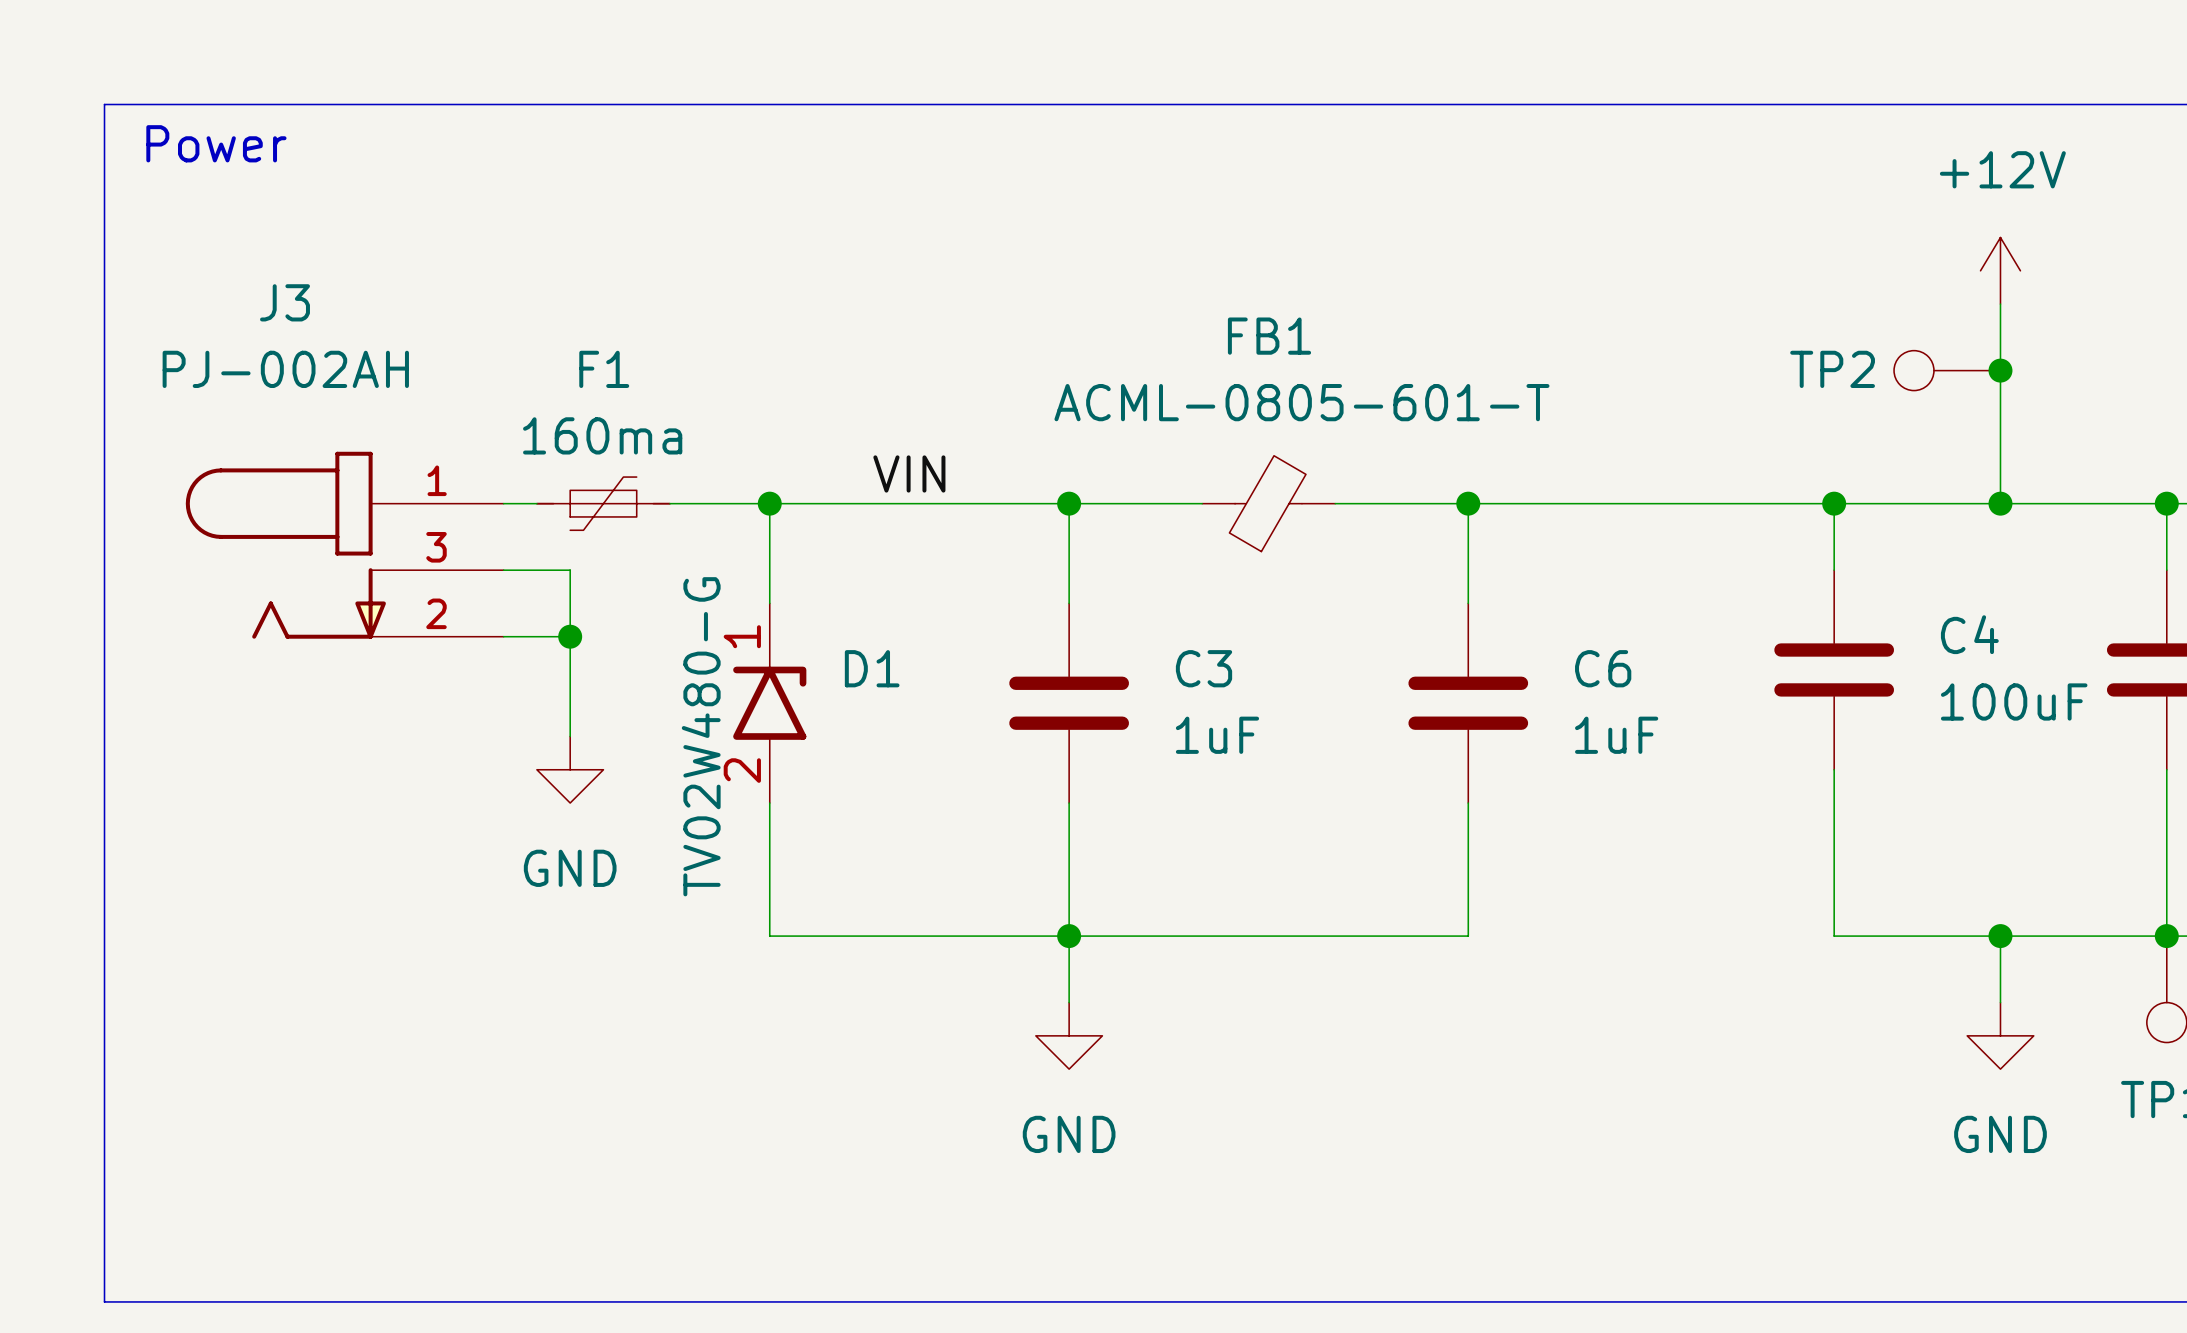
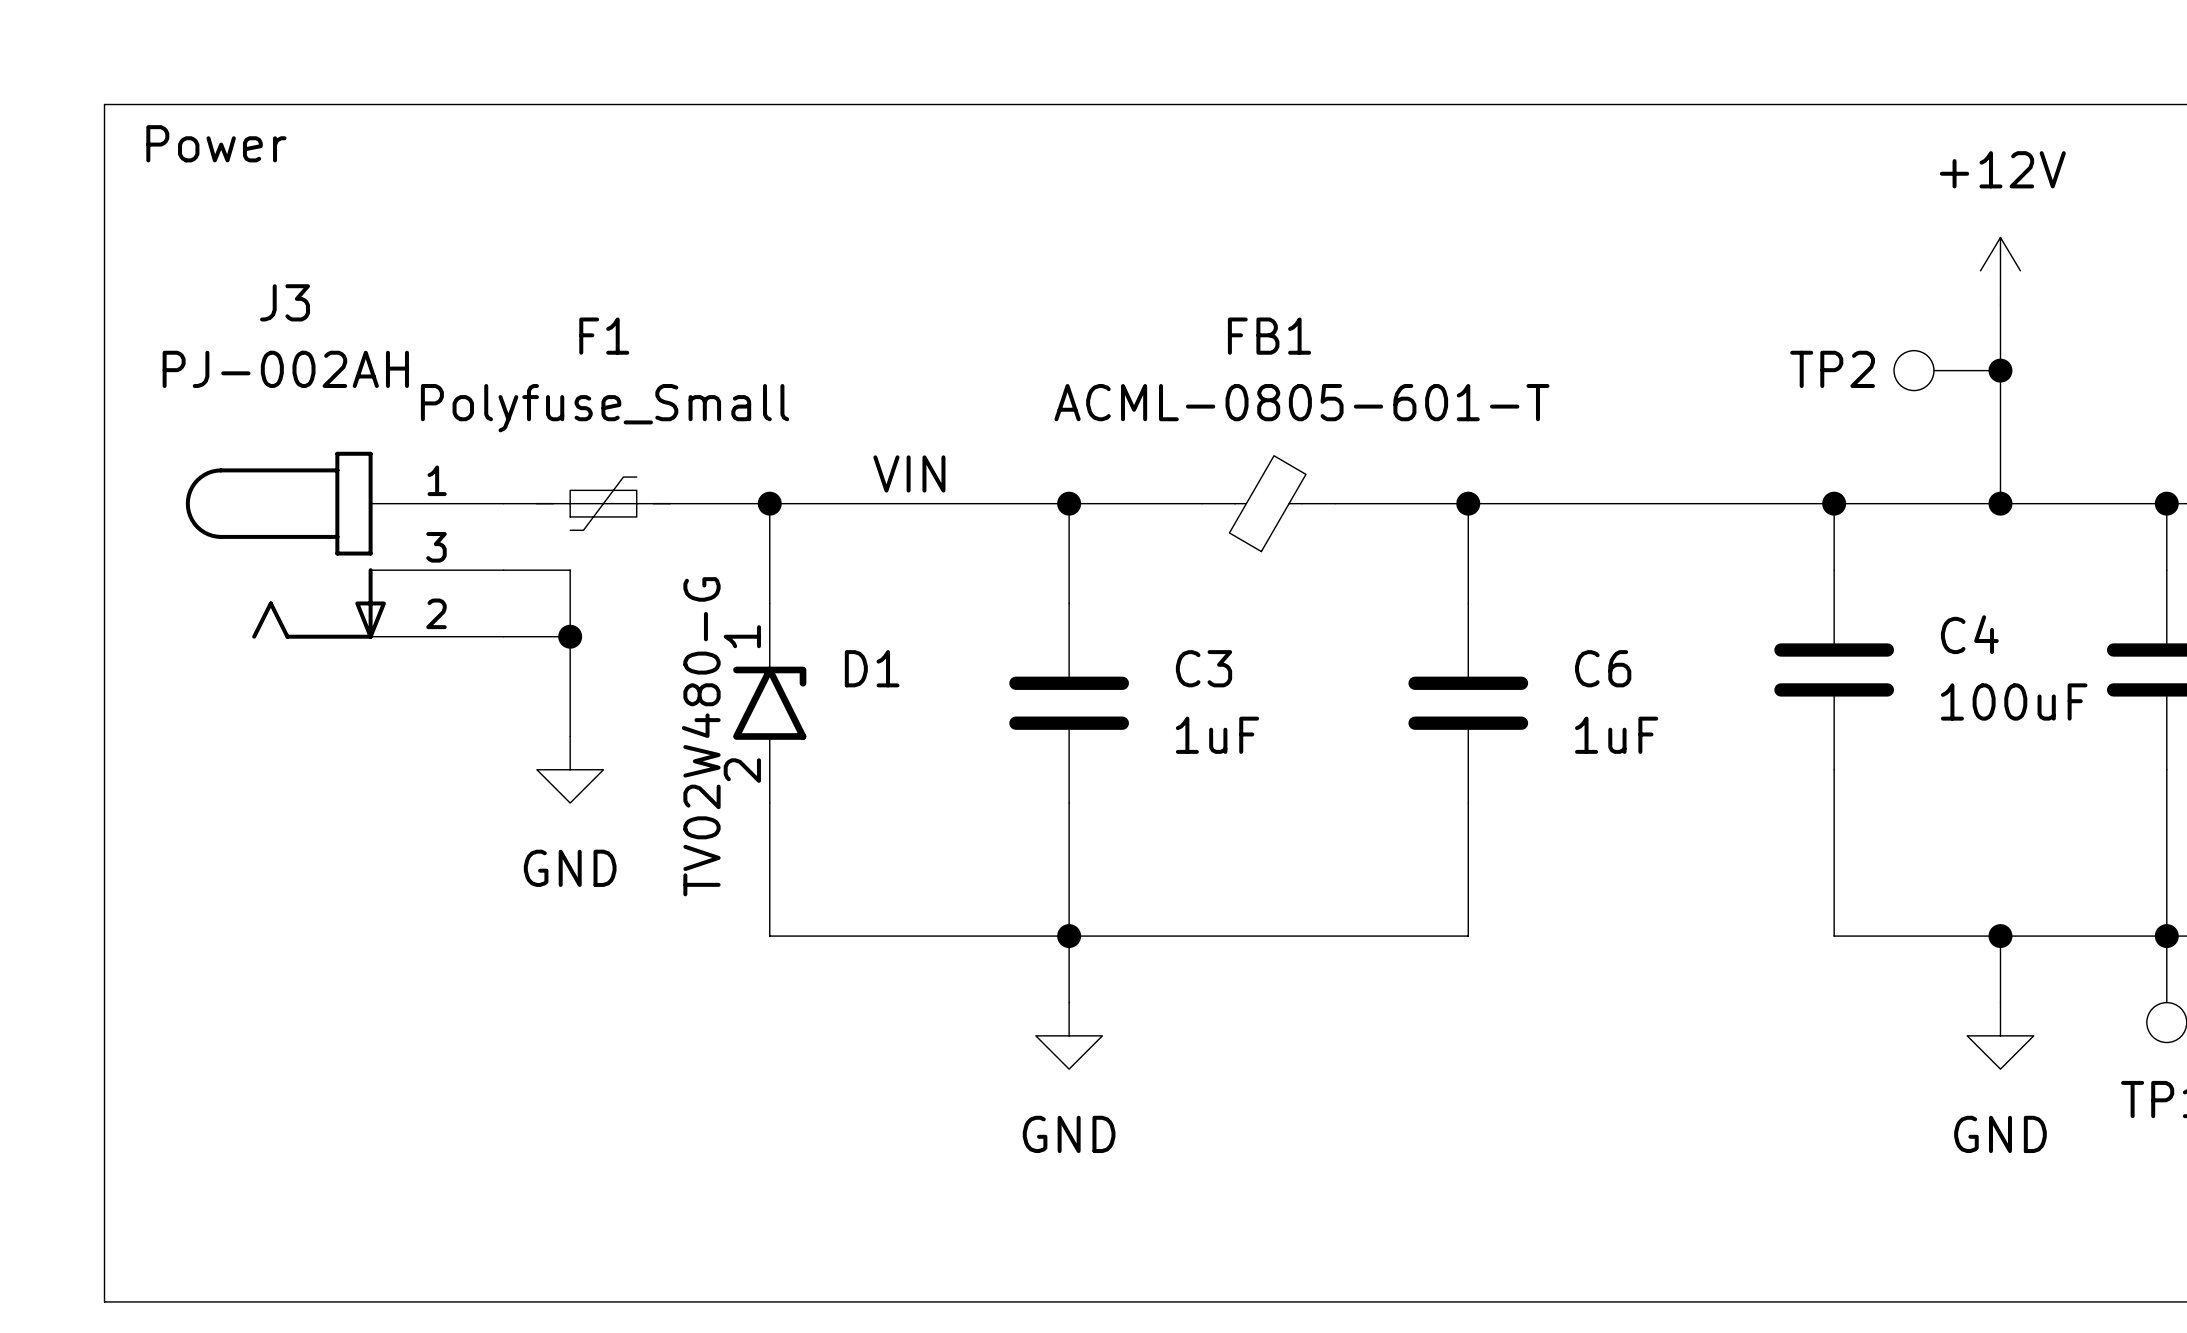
F1 name position: F1 (604, 369) -> F1 (604, 336)
F1 value: 160ma (602, 435) -> Polyfuse_Small (605, 408)

